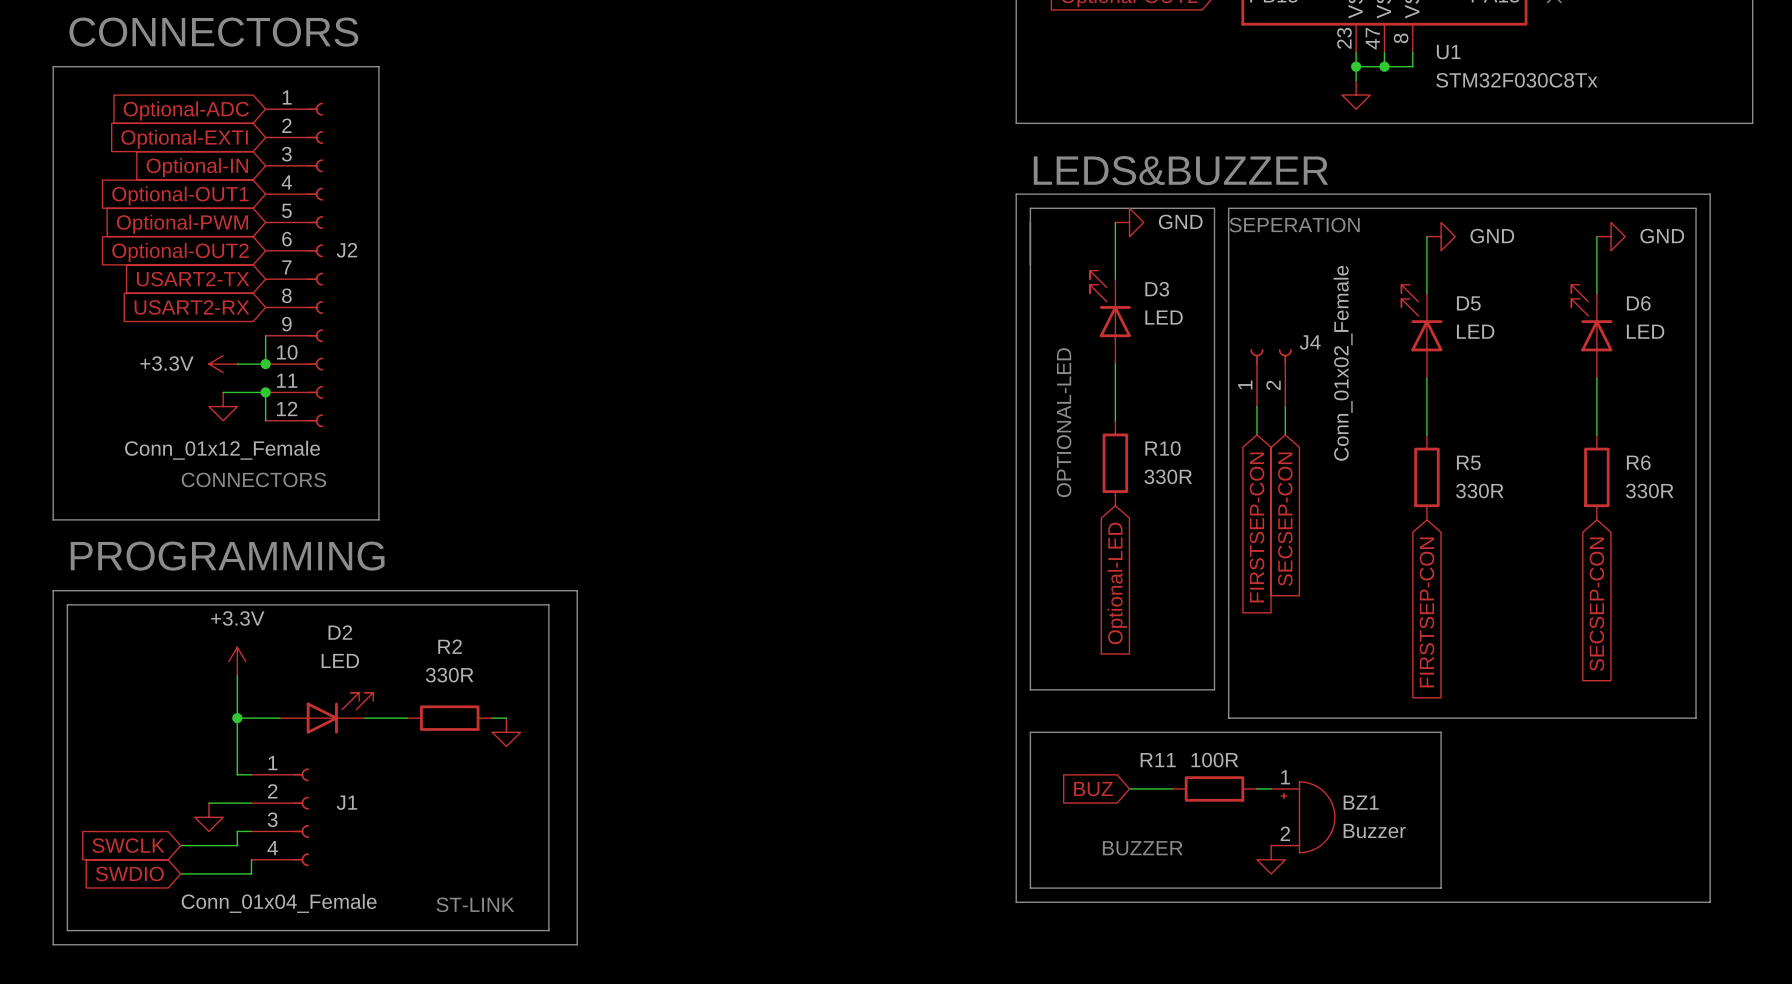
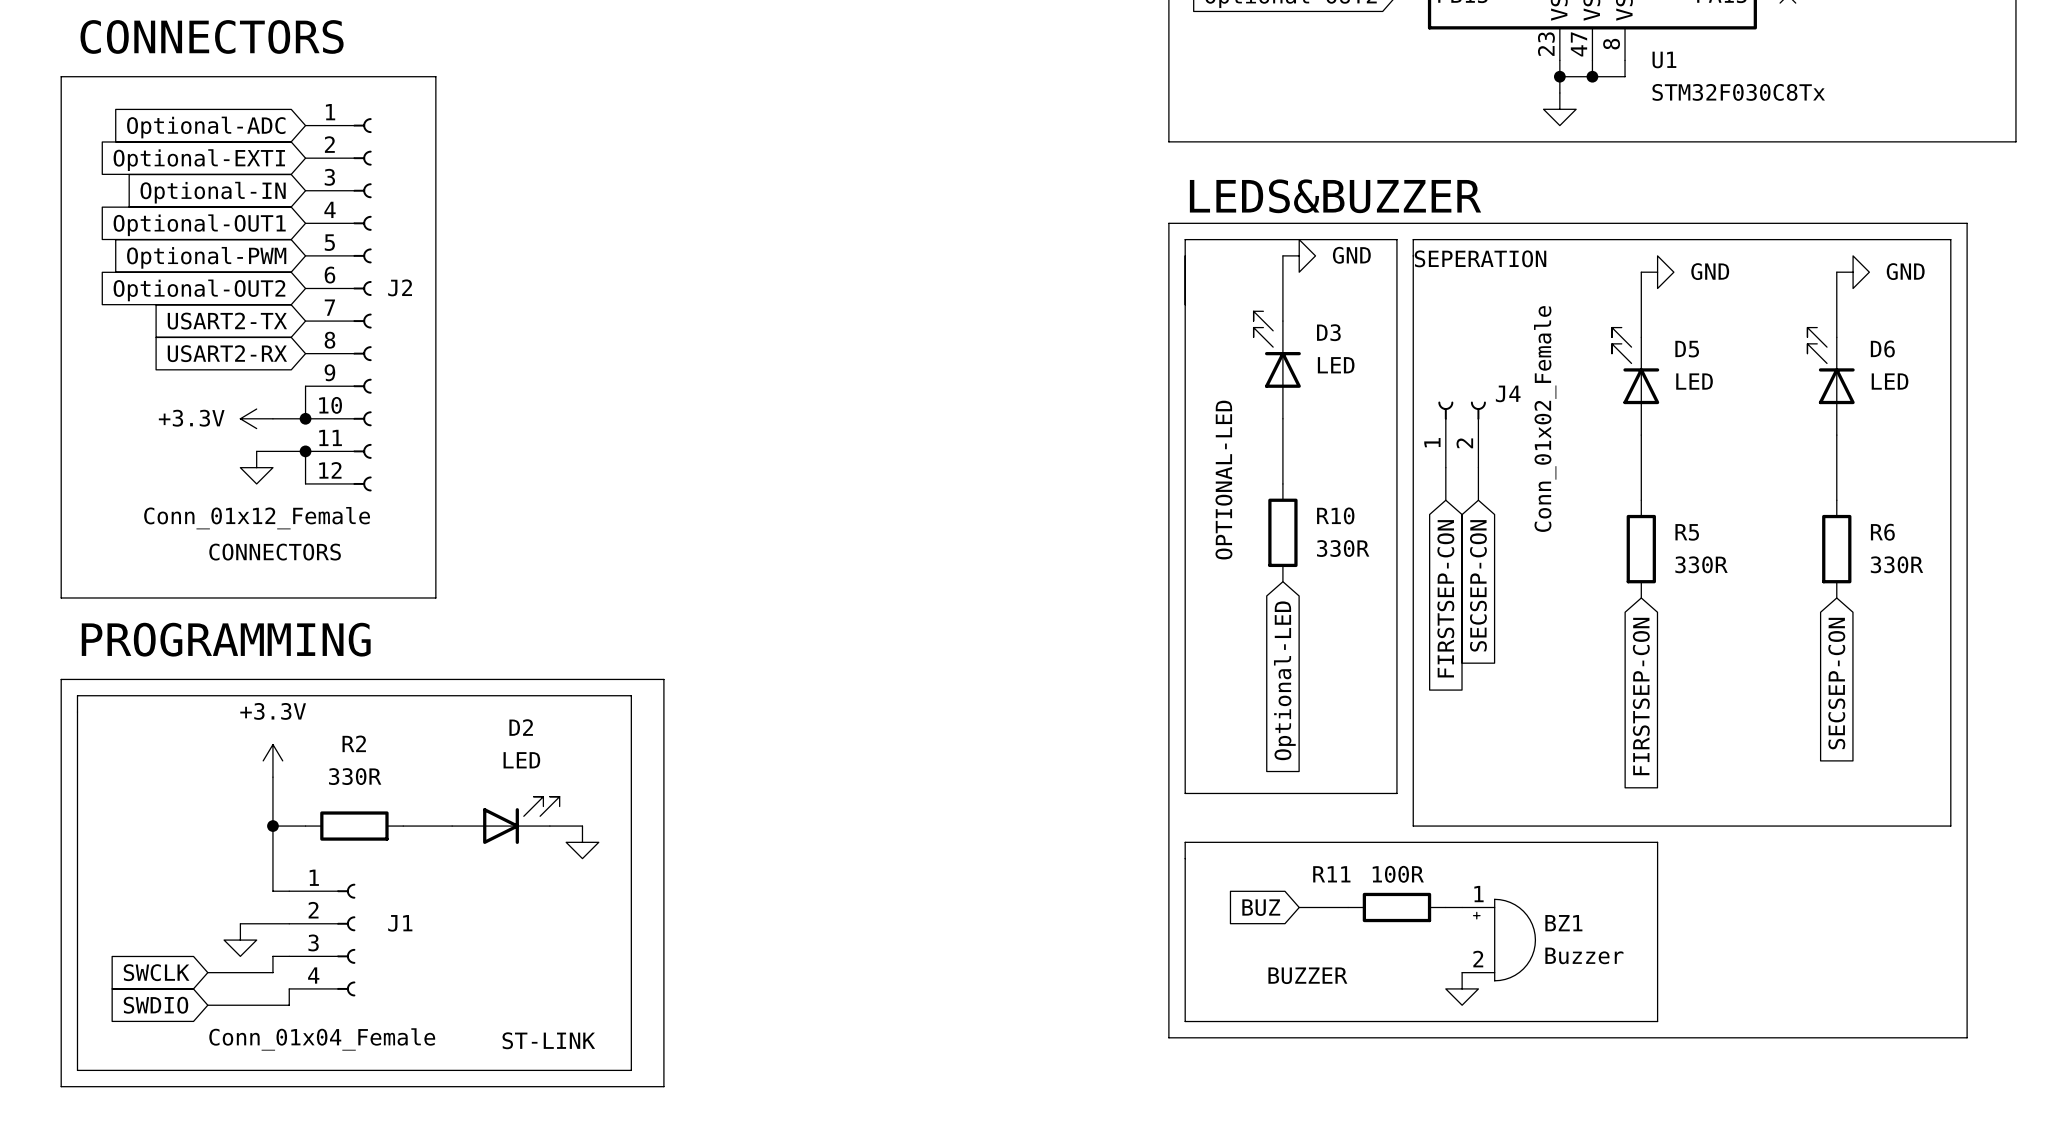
D2 position: (326, 713) -> (505, 820)
R2 position: (449, 718) -> (354, 826)

